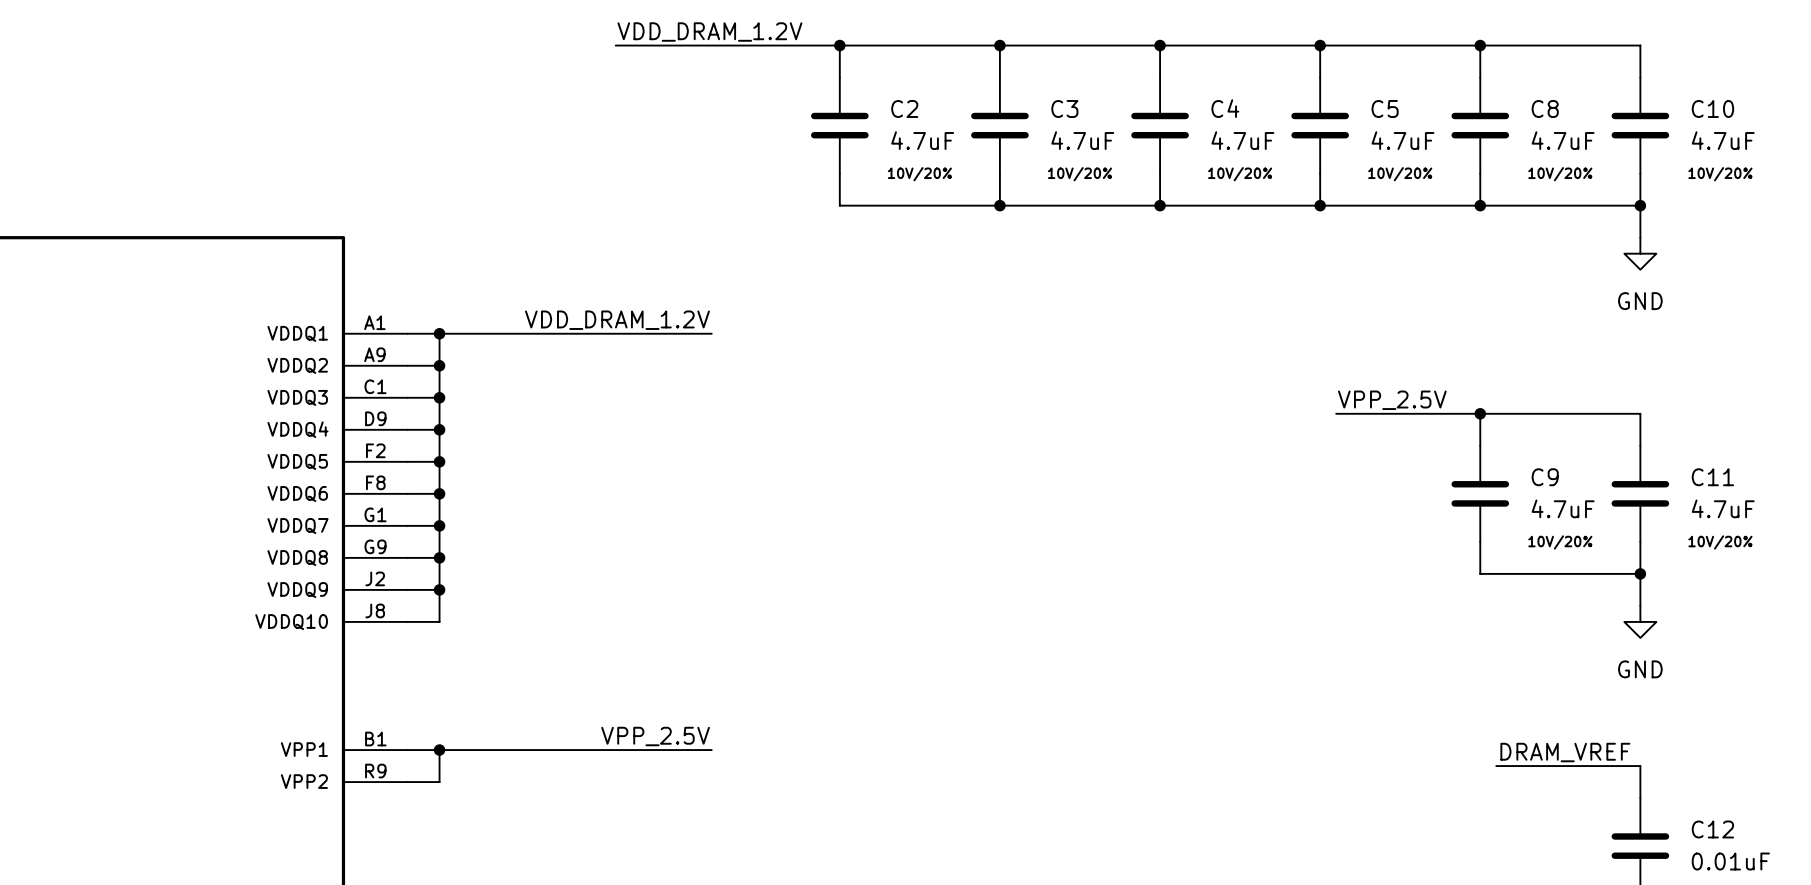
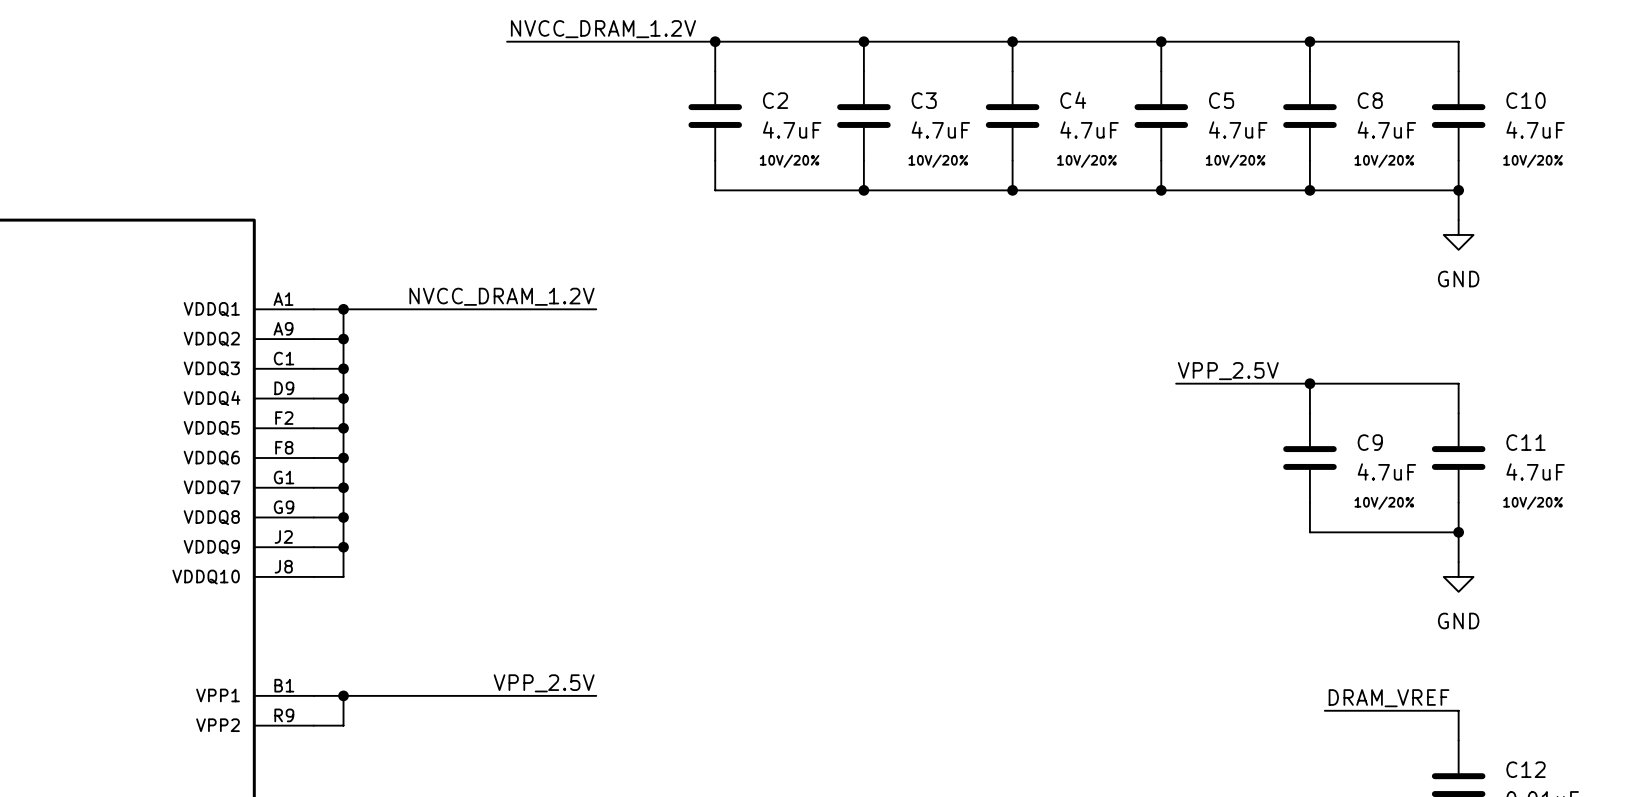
label: VDD_DRAM_1.2V (709, 32) -> NVCC_DRAM_1.2V (603, 29)
label: VDD_DRAM_1.2V (617, 320) -> NVCC_DRAM_1.2V (502, 296)

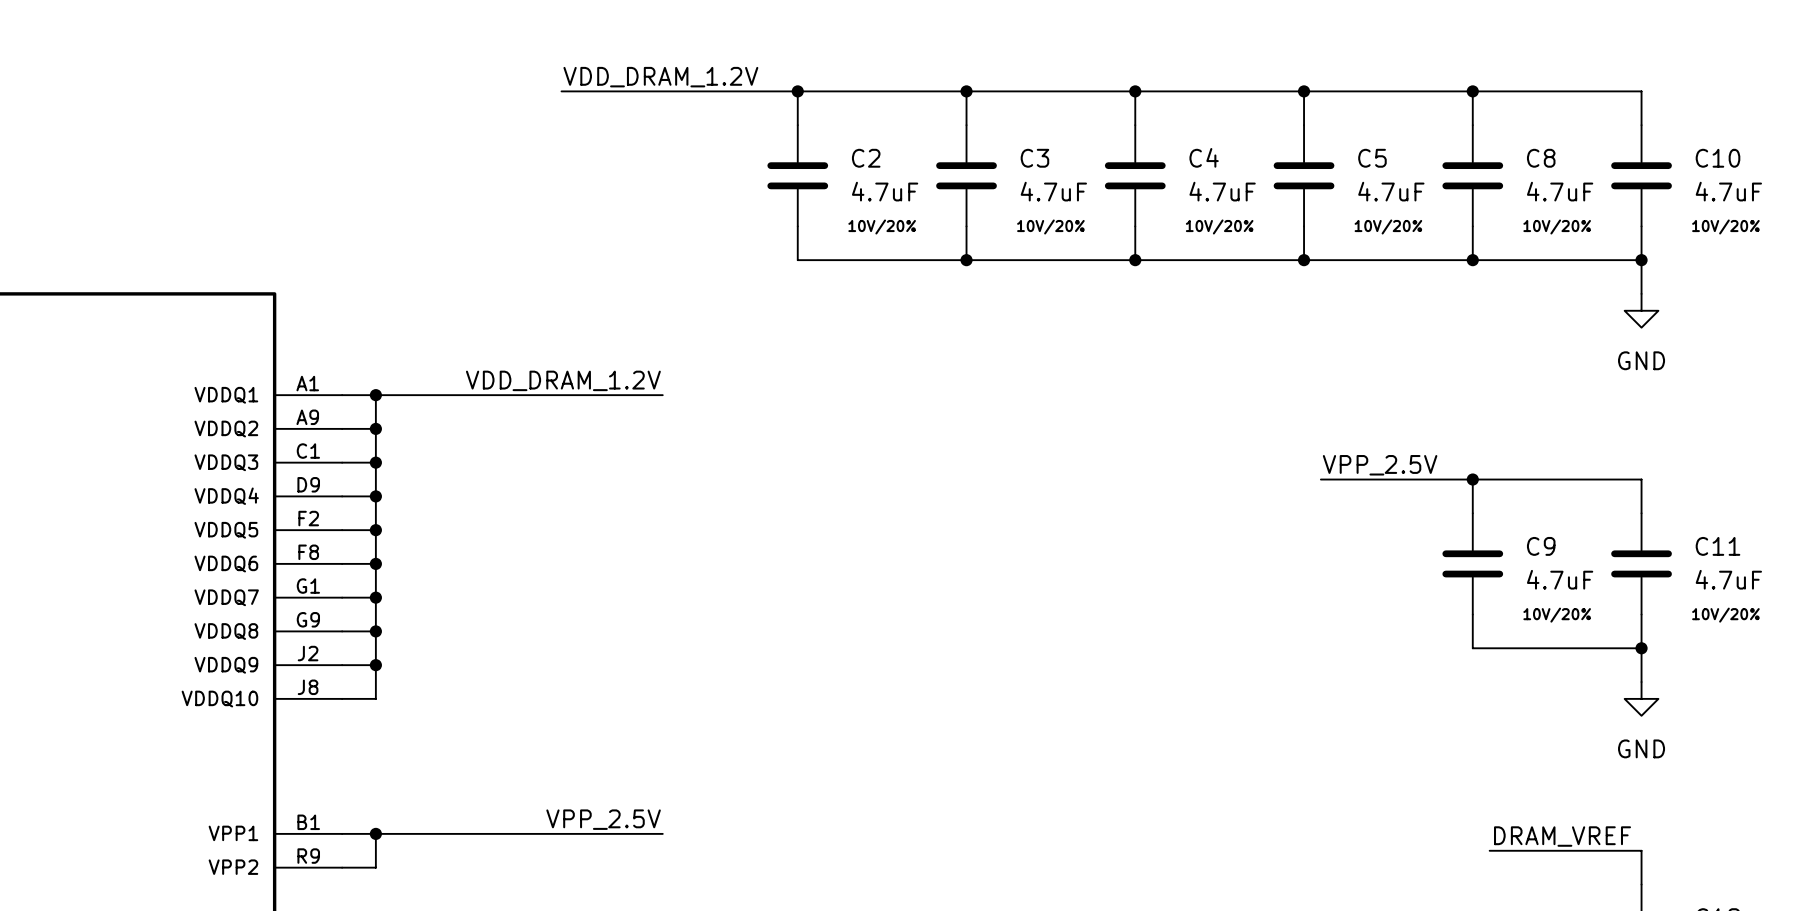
label: NVCC_DRAM_1.2V (603, 29) -> VDD_DRAM_1.2V (660, 77)
label: NVCC_DRAM_1.2V (502, 296) -> VDD_DRAM_1.2V (563, 380)

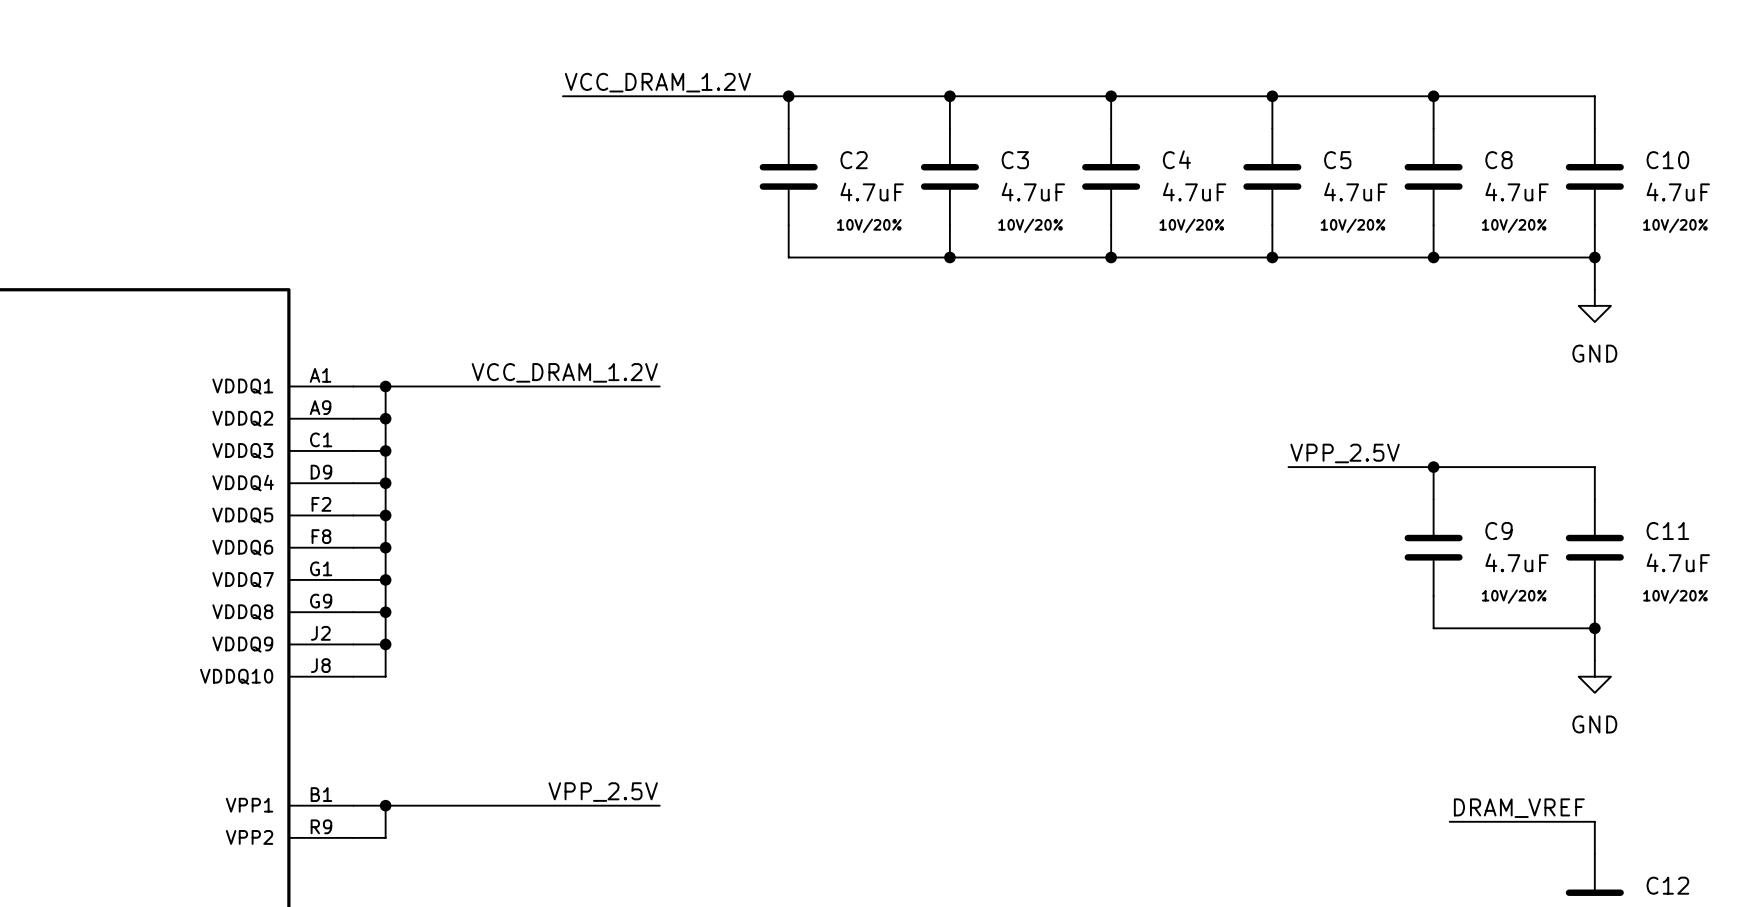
label: VDD_DRAM_1.2V (660, 77) -> VCC_DRAM_1.2V (657, 82)
label: VDD_DRAM_1.2V (563, 380) -> VCC_DRAM_1.2V (564, 372)

